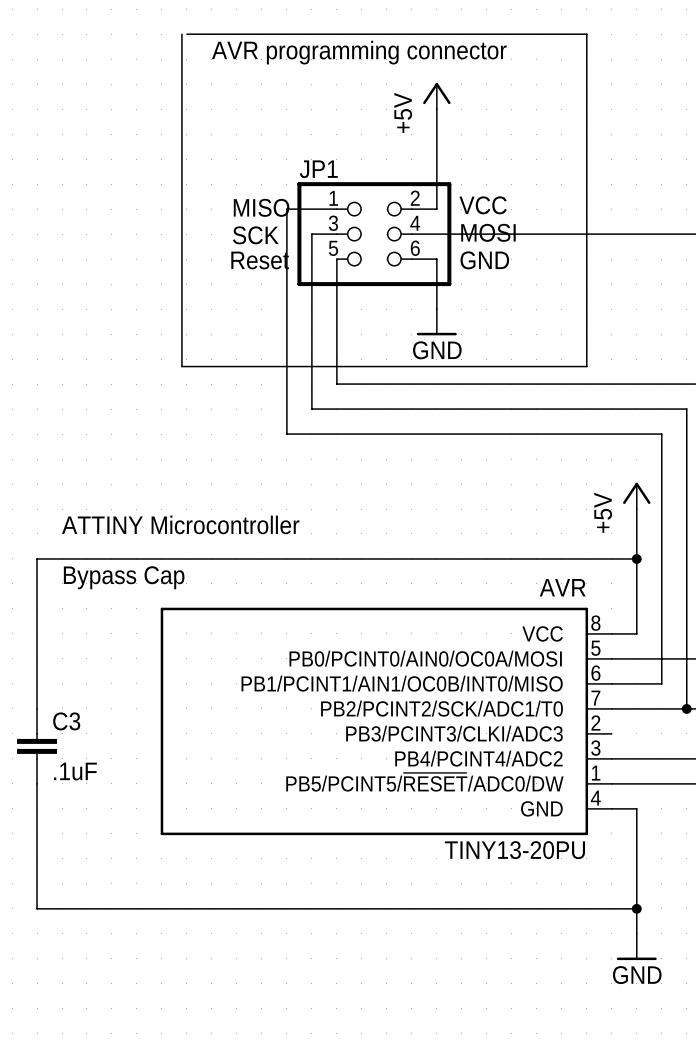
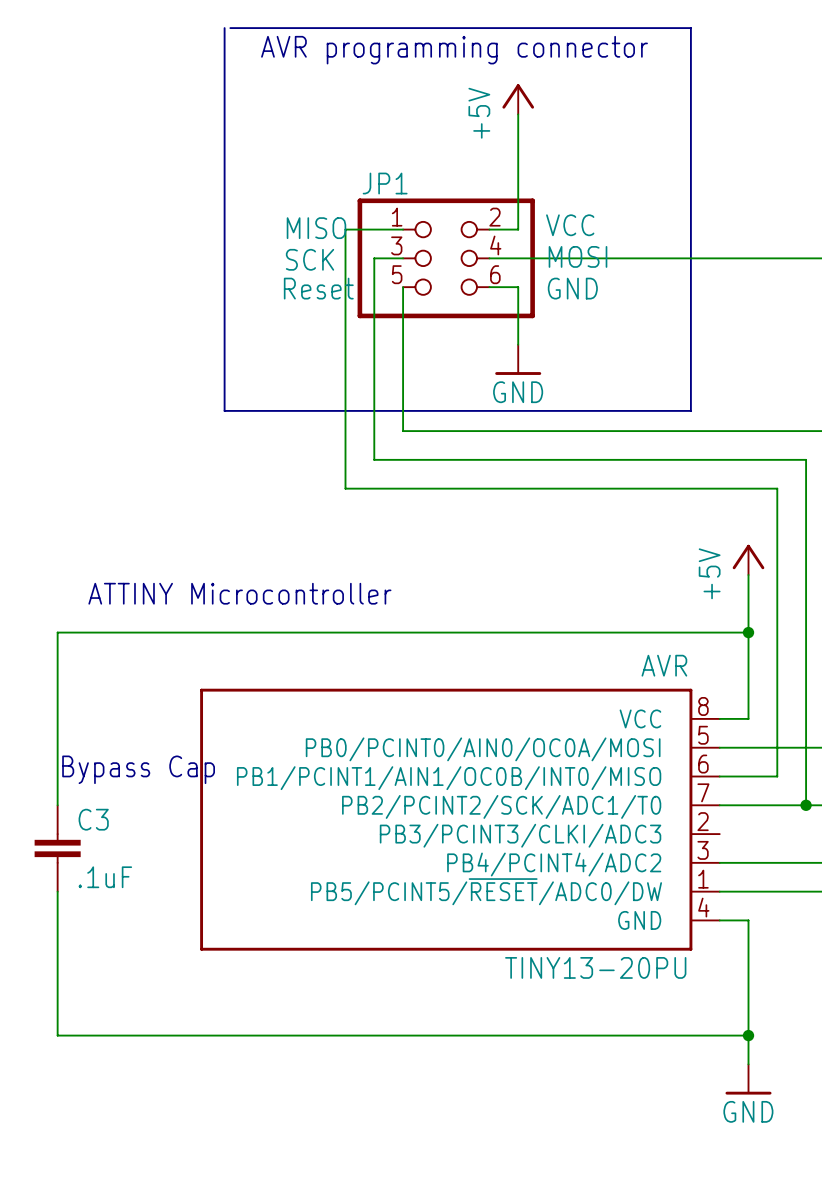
text position: Bypass Cap (124, 577) -> Bypass Cap (138, 769)

